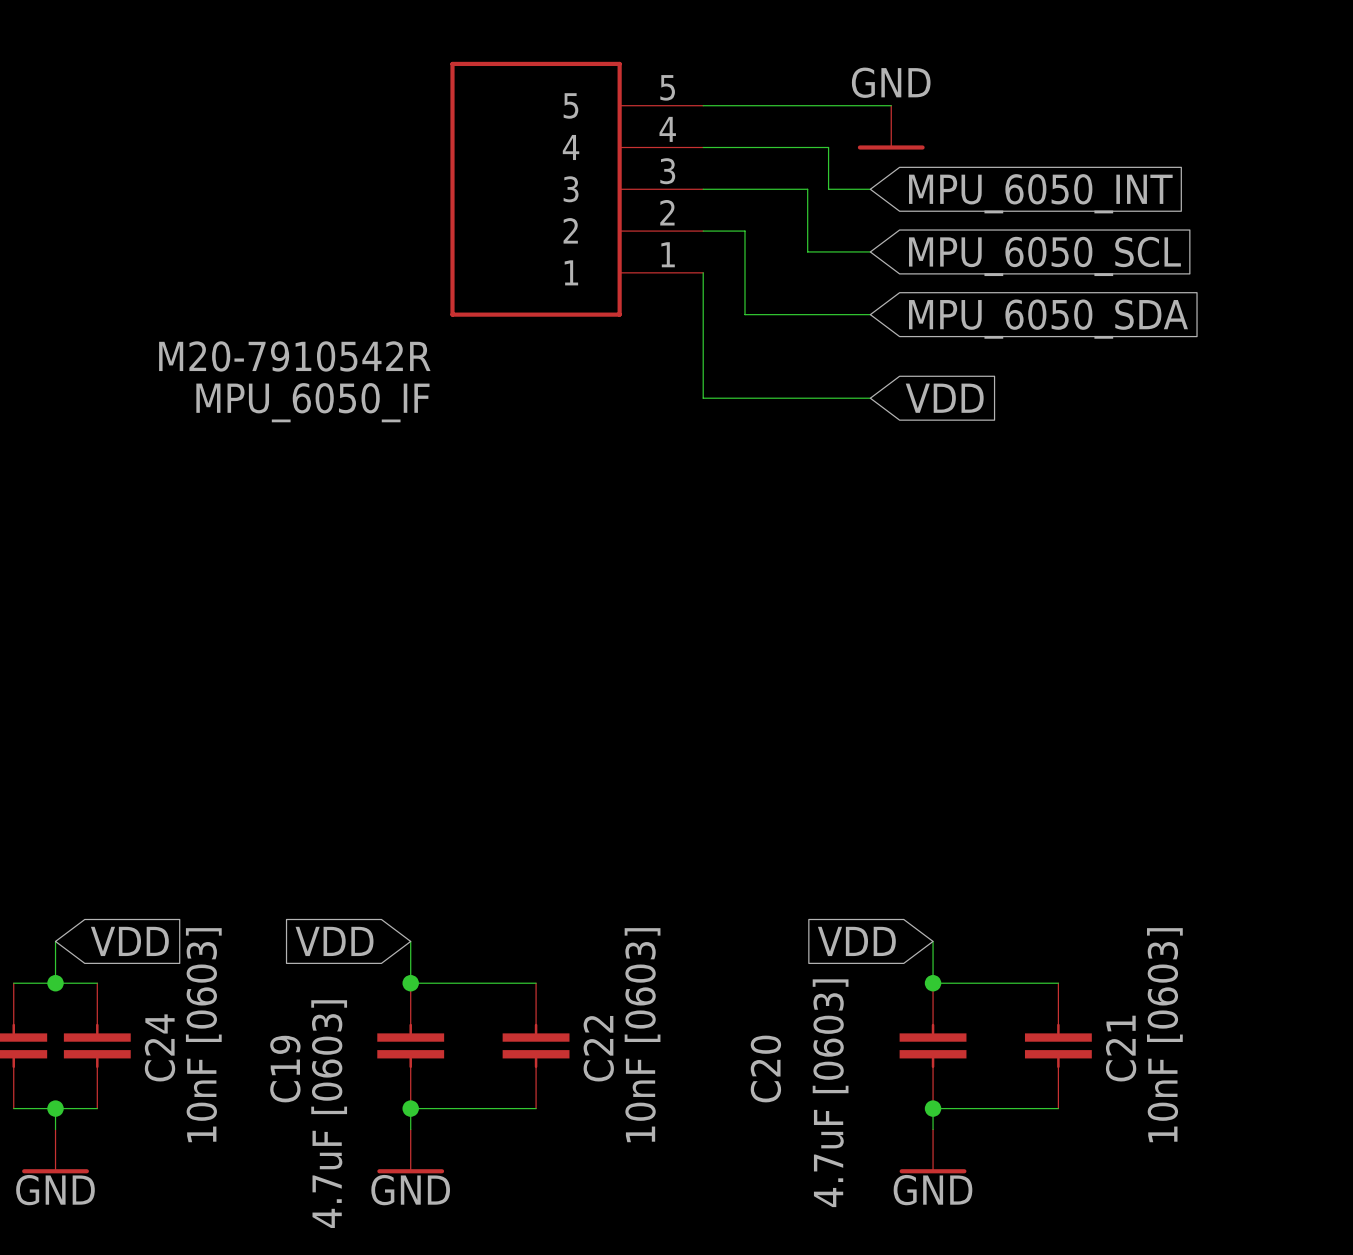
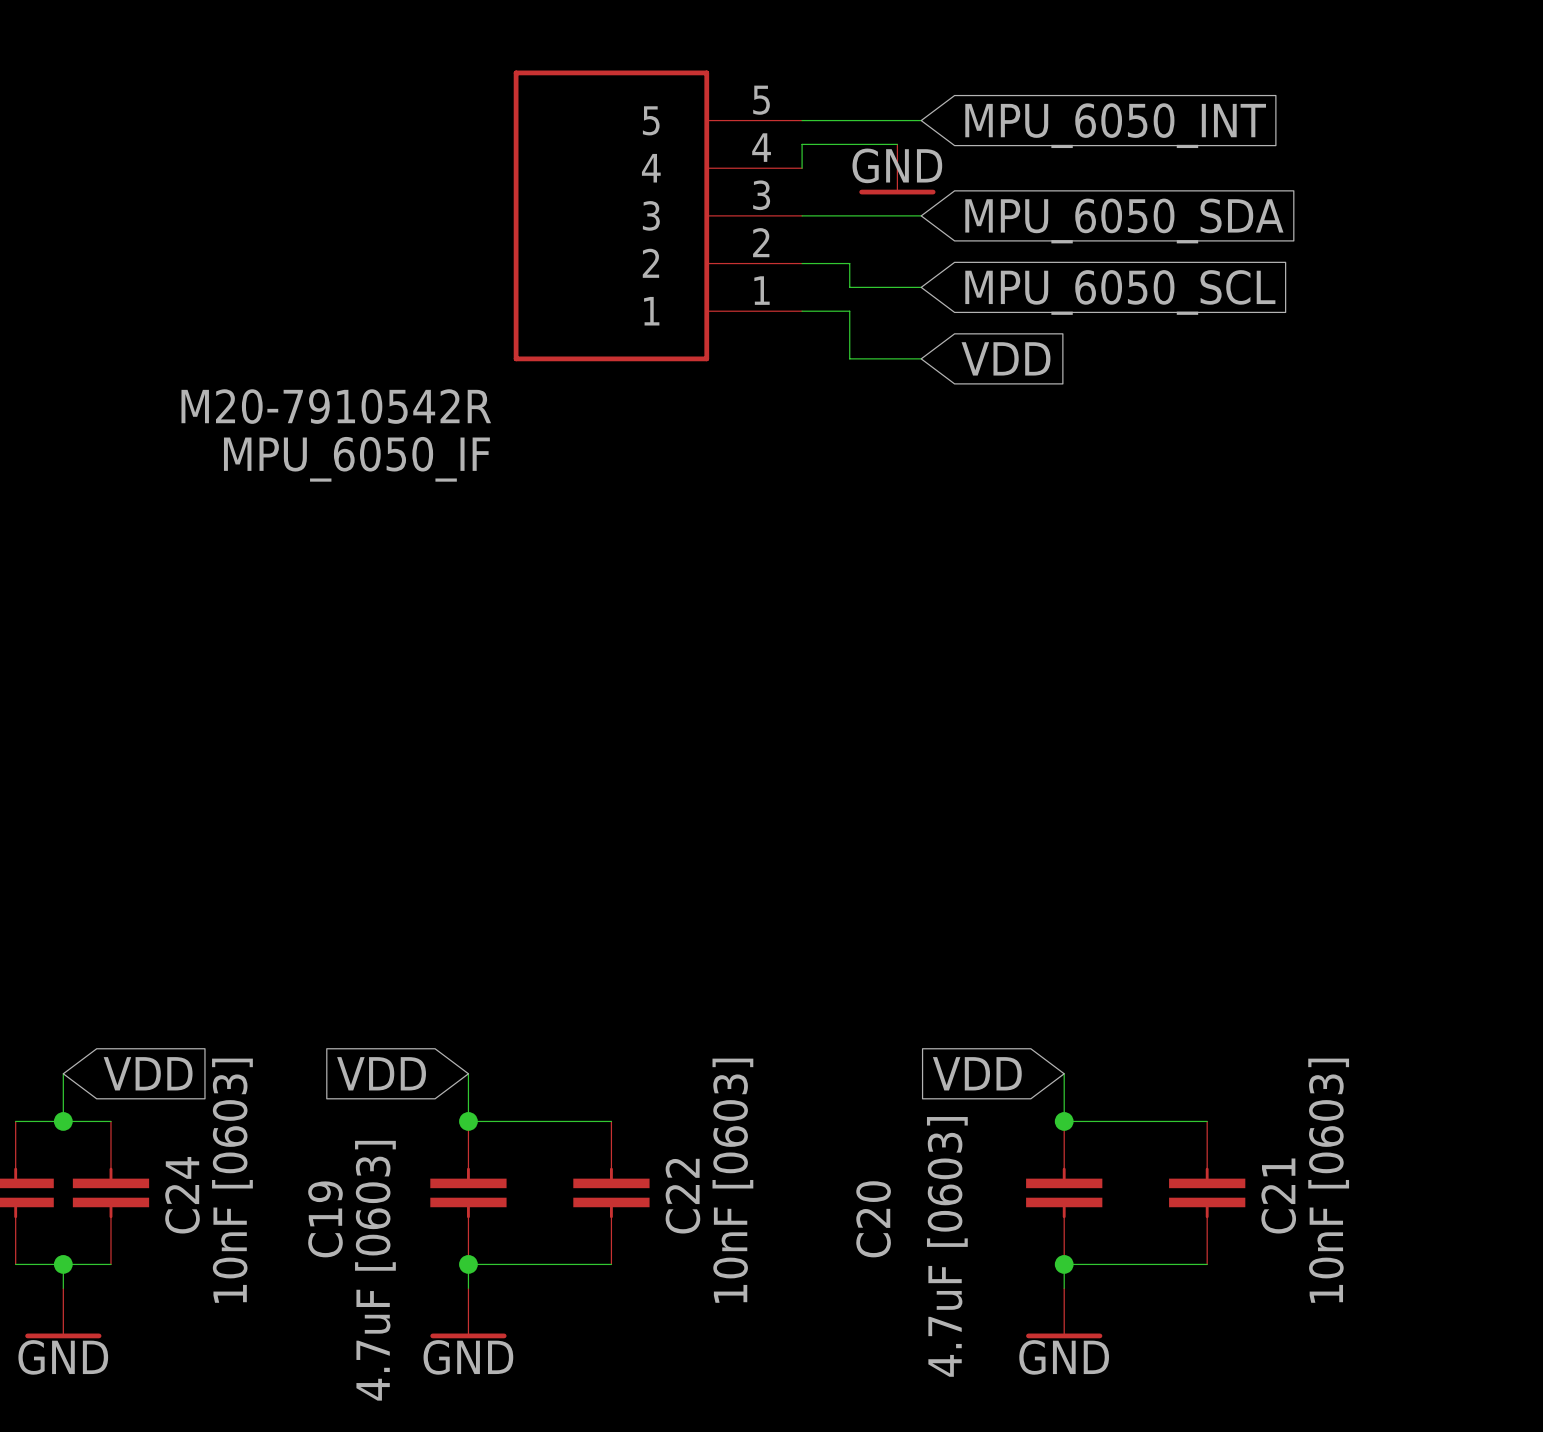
power symbol text position: GND (891, 82) -> GND (897, 165)
wire: (807, 105) (891, 105) -> none
power symbol position: GND (891, 127) -> GND (897, 169)
wire: (703, 147) (828, 147) (828, 189) (870, 189) -> (802, 168) (802, 144) (897, 144)
wire: (807, 189) (807, 251) (870, 251) -> none
global label position: MPU_6050_INT (1040, 193) -> MPU_6050_INT (1115, 125)
wire: (745, 251) (745, 272) -> (802, 311) (849, 311)
global label position: MPU_6050_SCL (1044, 256) -> MPU_6050_SCL (1120, 292)
wire: (703, 272) (703, 398) (870, 398) -> none
wire: (807, 314) (870, 314) -> (849, 287) (921, 287)
global label position: MPU_6050_SDA (1048, 319) -> MPU_6050_SDA (1124, 220)
global label position: VDD (944, 398) -> VDD (1006, 358)

